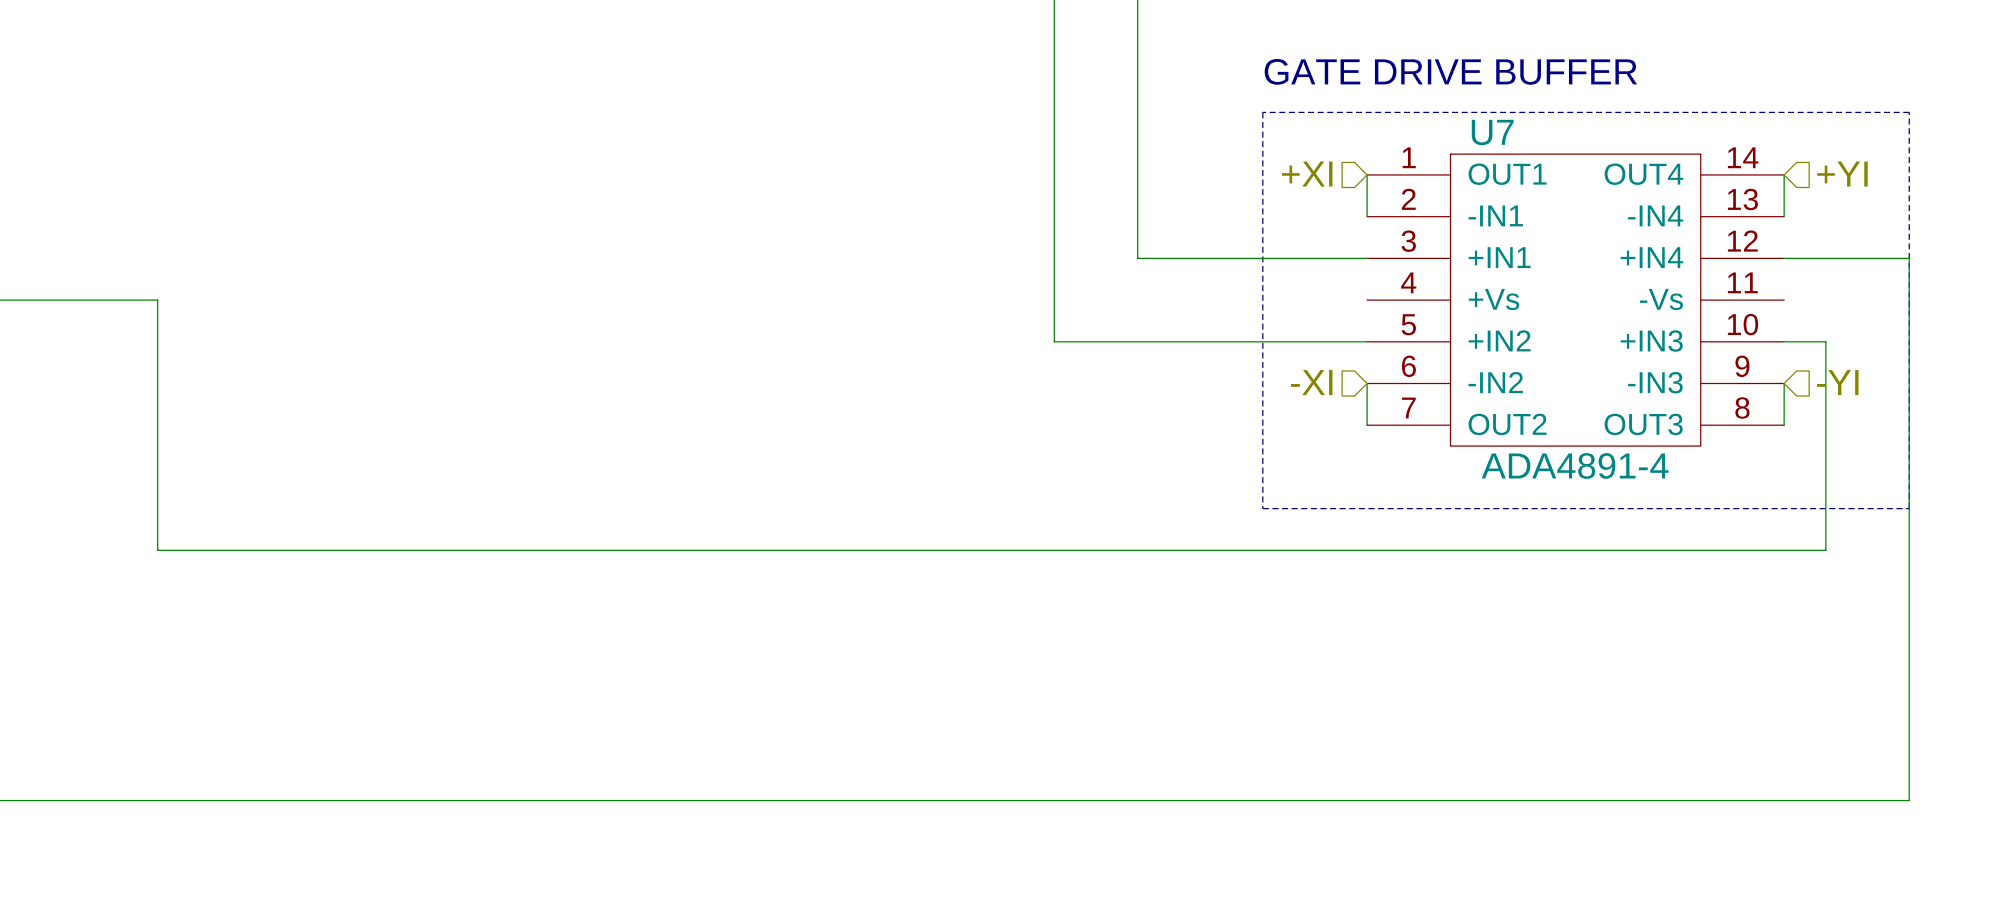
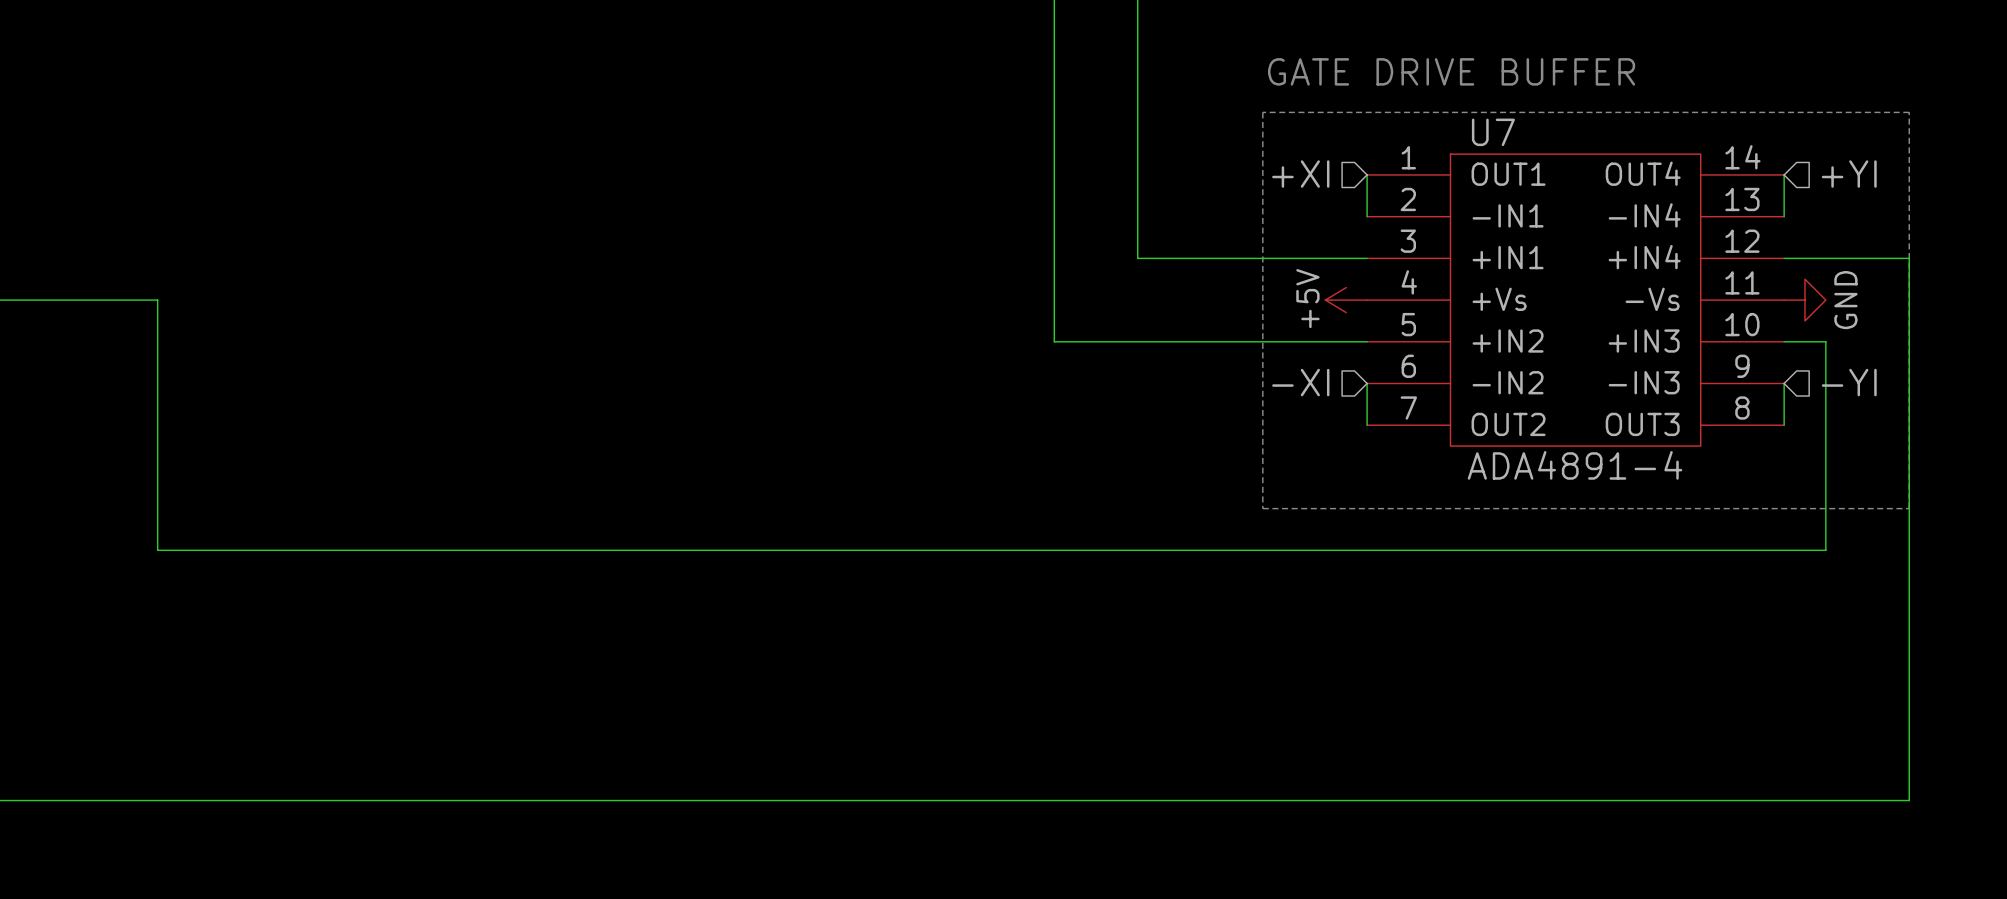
power symbol: none -> +5V (1346, 300)
power symbol: none -> GND (1804, 300)

